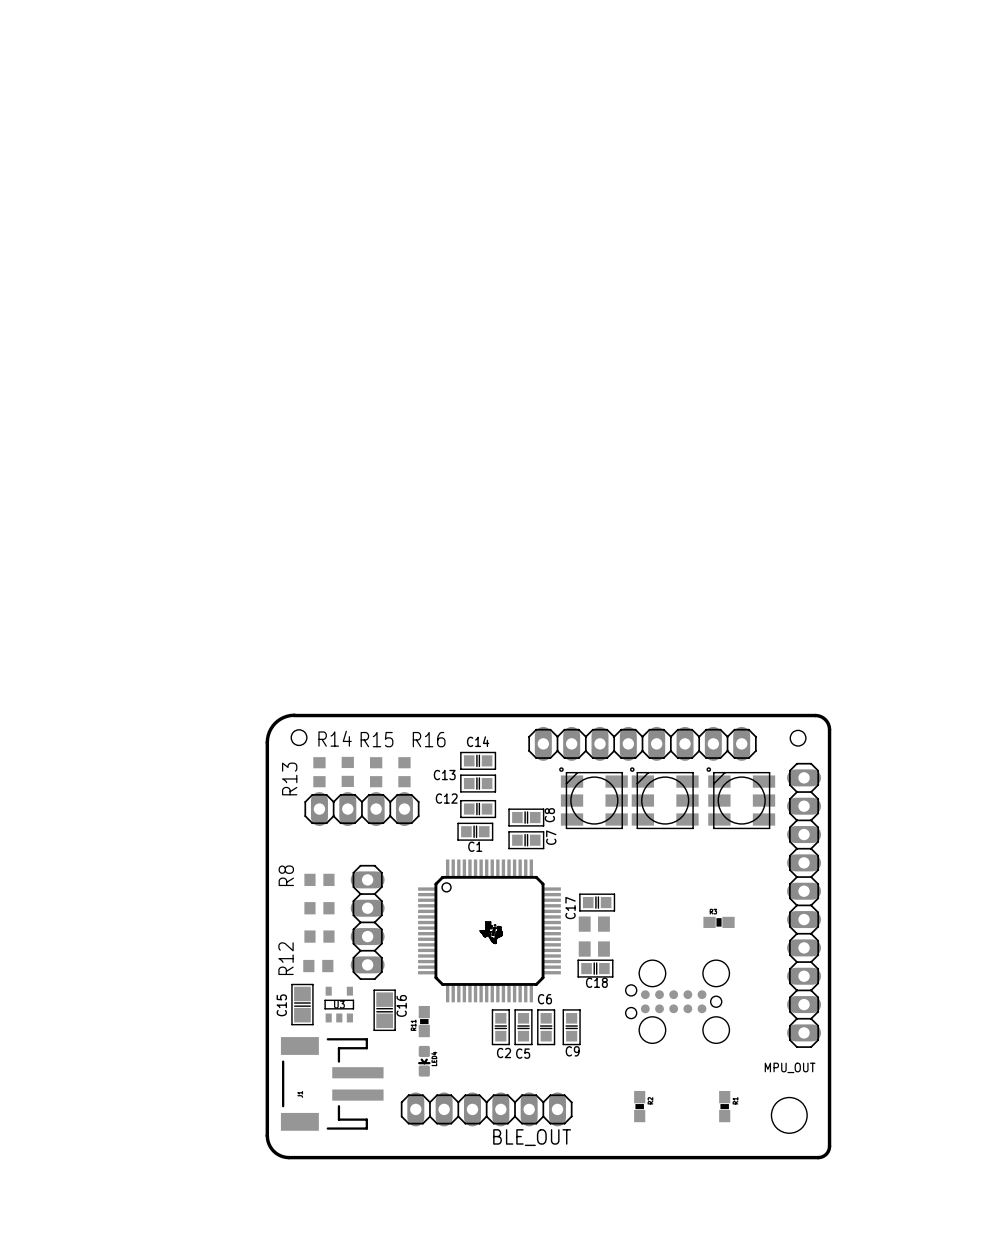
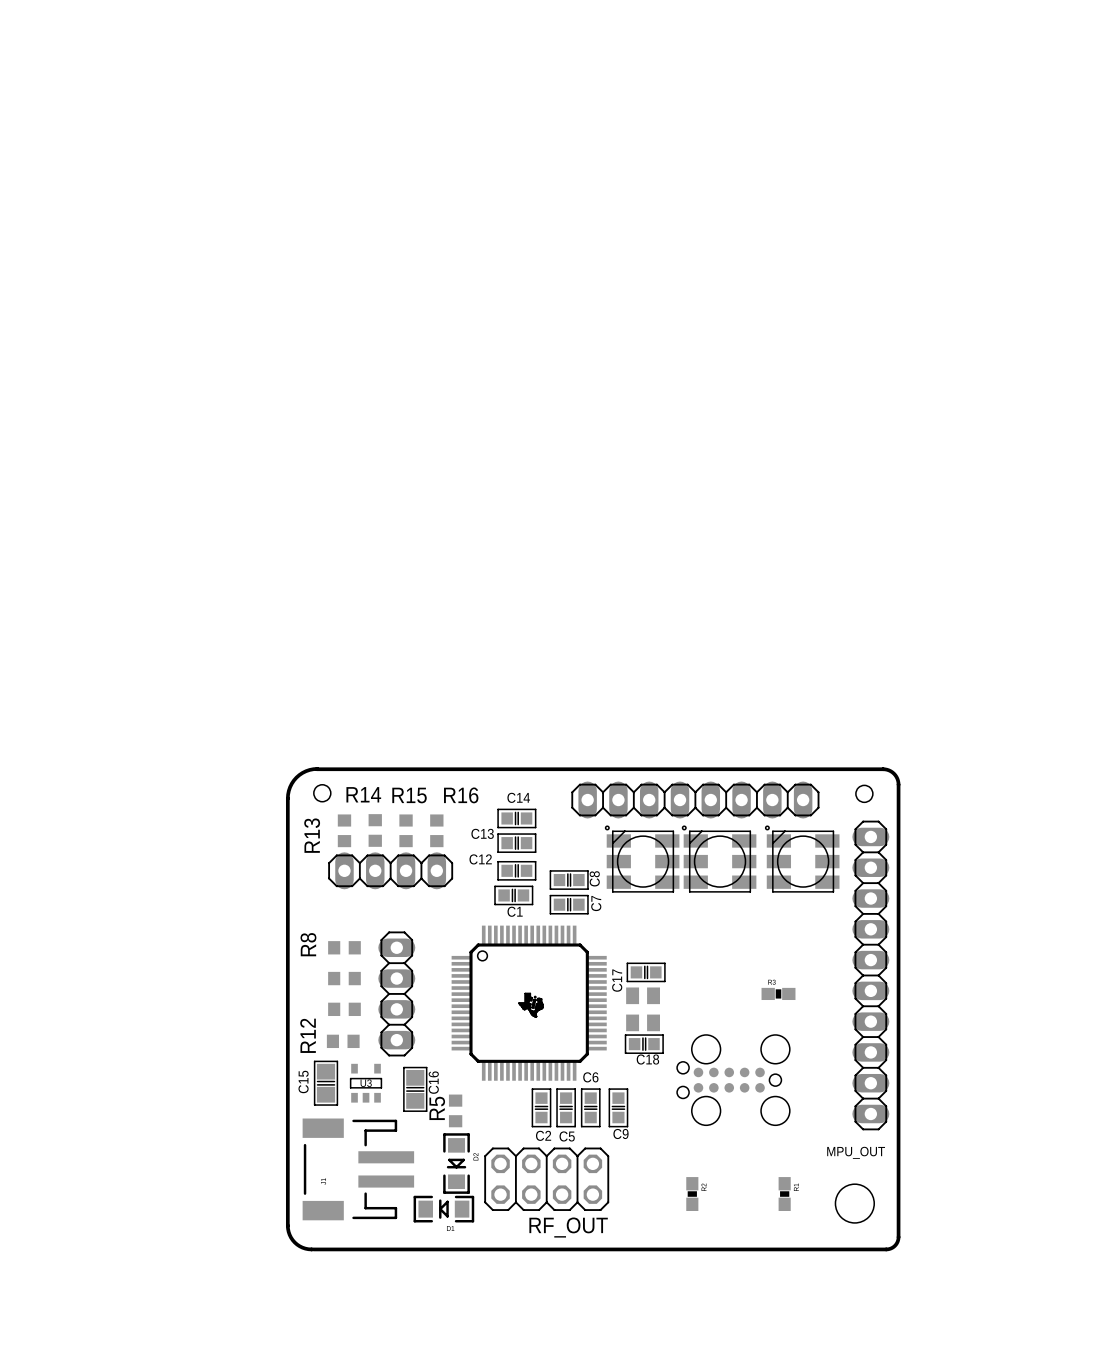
part: (424, 1021) -> none
R5: none -> (455, 1110)
part: (424, 1061) -> none
part: none -> (456, 1163)
RF_OUT: none -> (546, 1179)
BLE_OUT: (486, 1109) -> none
part: none -> (443, 1209)

